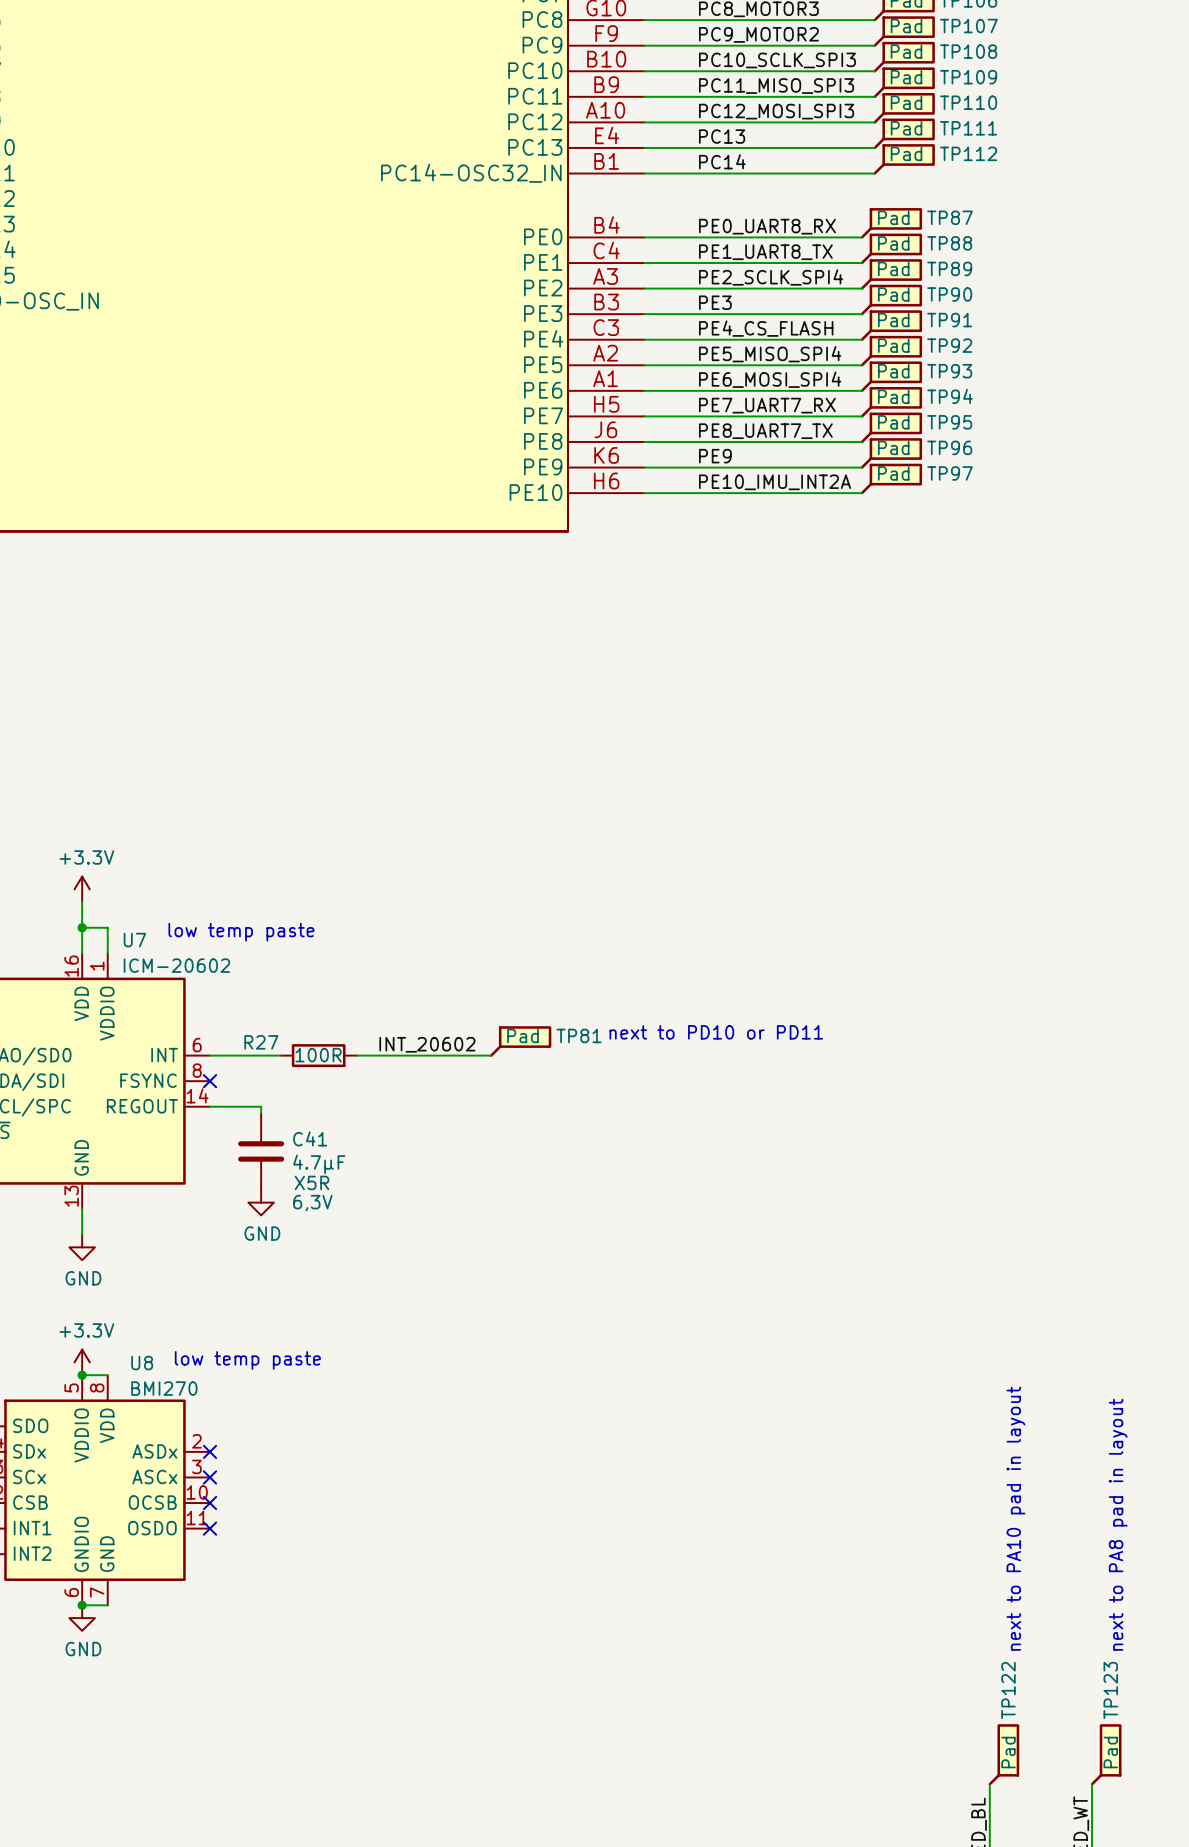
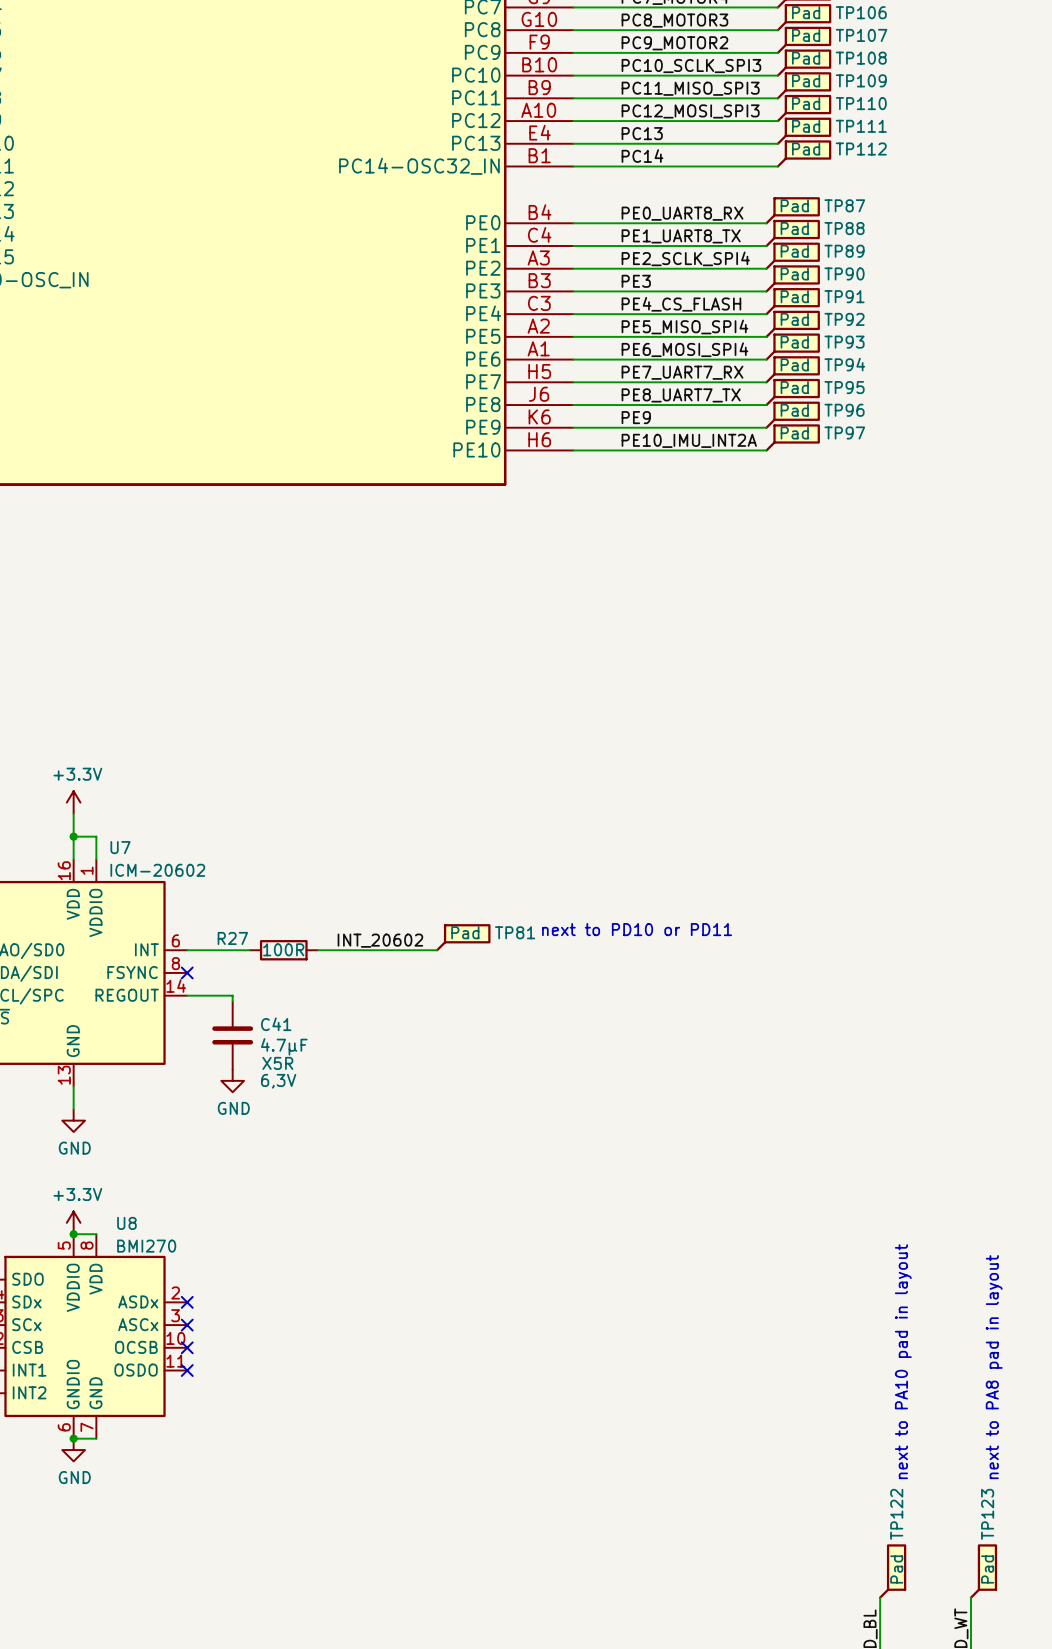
text: low temp paste (241, 932) -> none
text: low temp paste (247, 1360) -> none

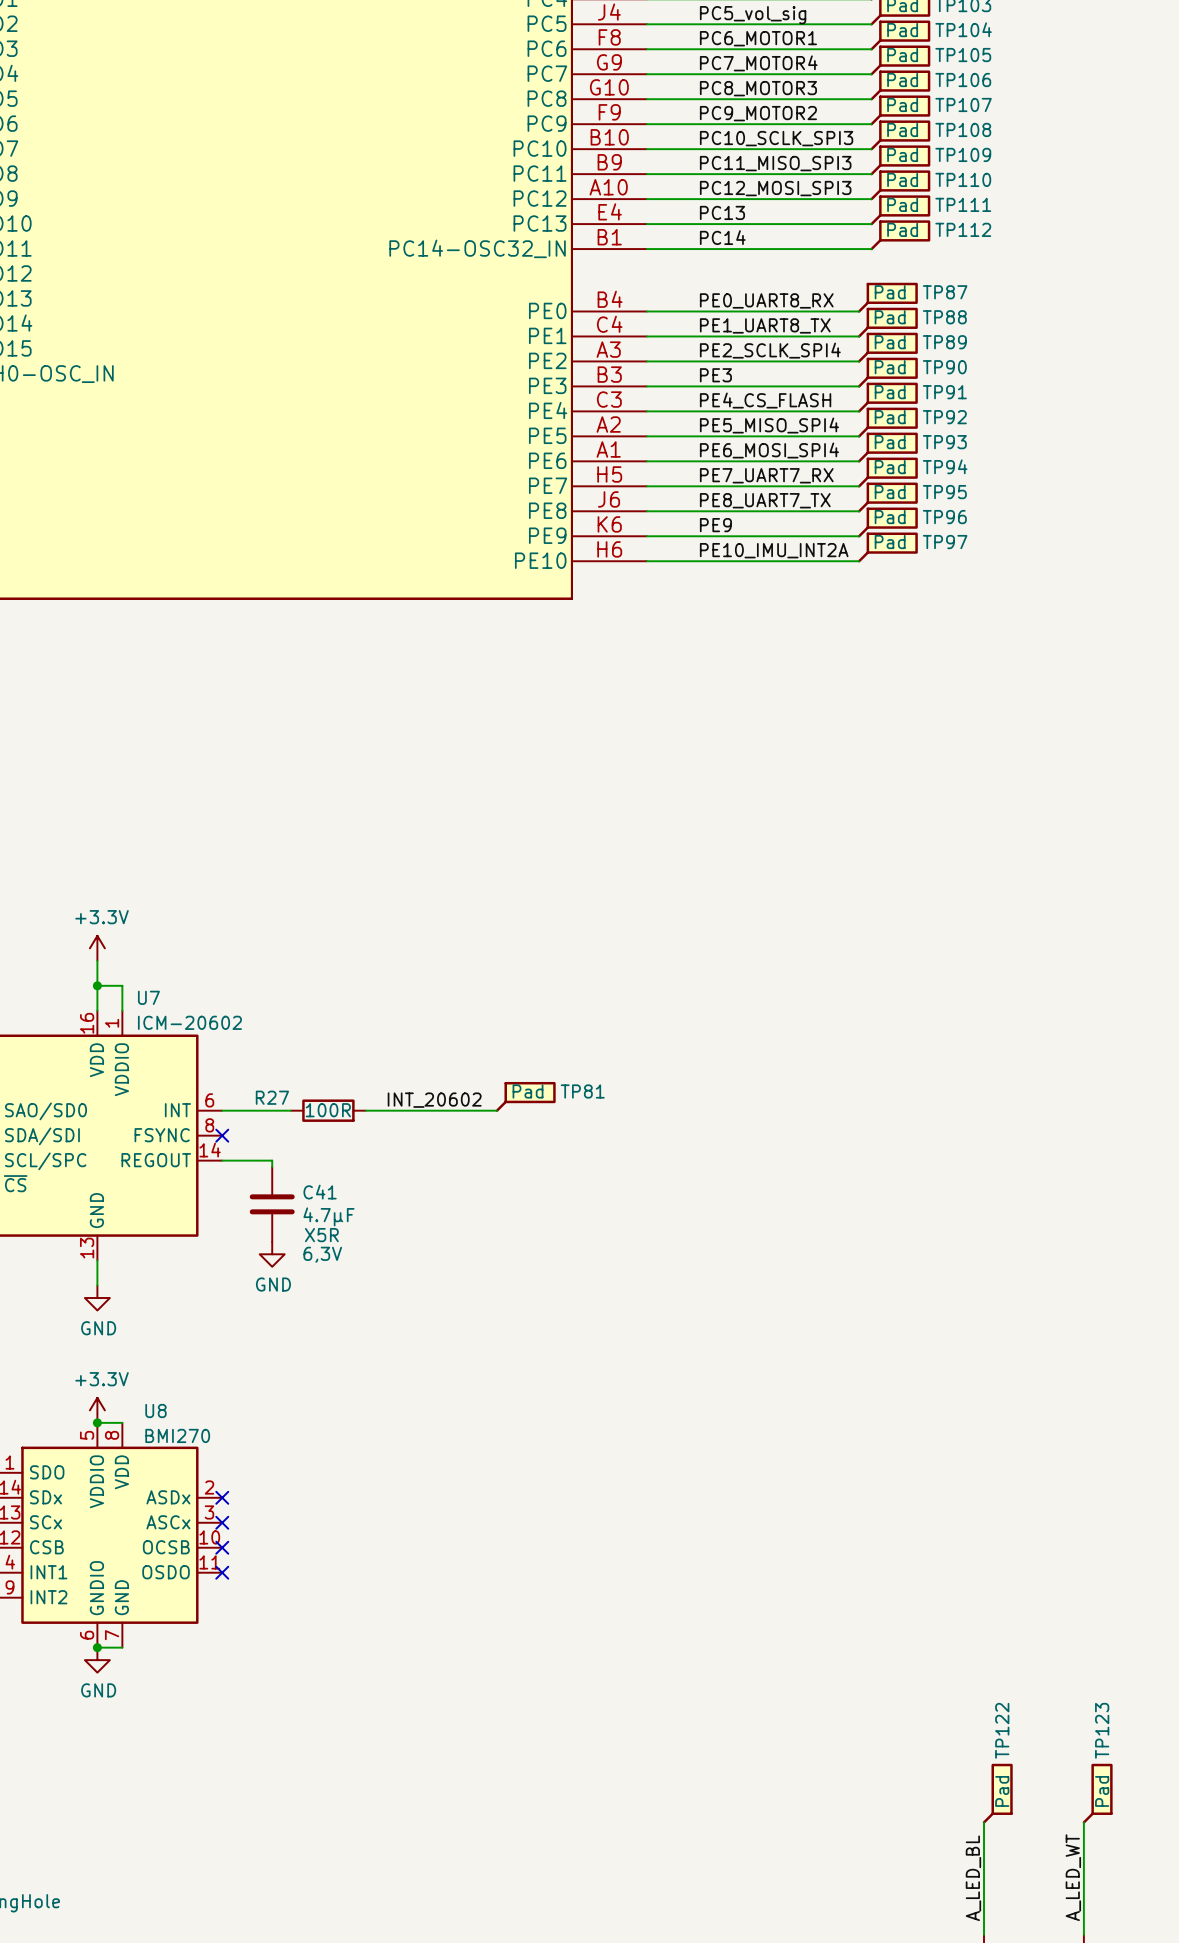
text: next to PD10 or PD11 (637, 929) -> none
text: next to PA10 pad in layout (903, 1361) -> none
text: next to PA8 pad in layout (994, 1367) -> none

